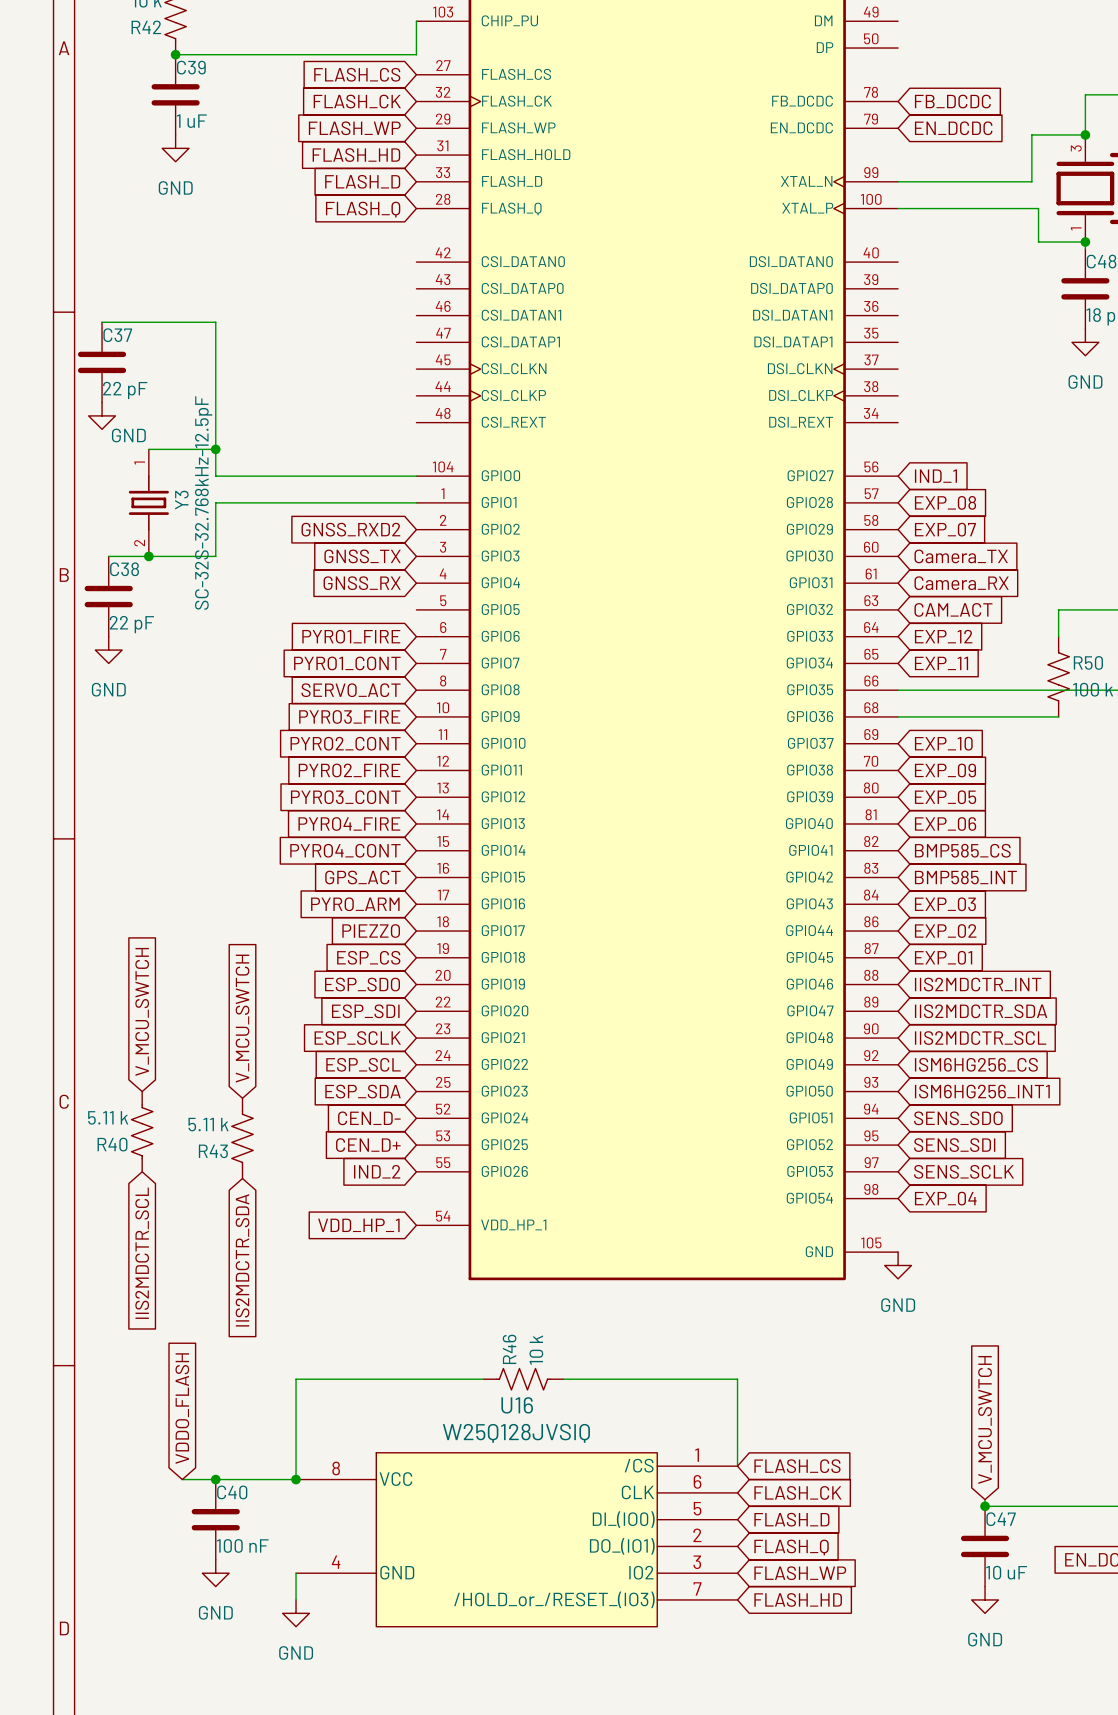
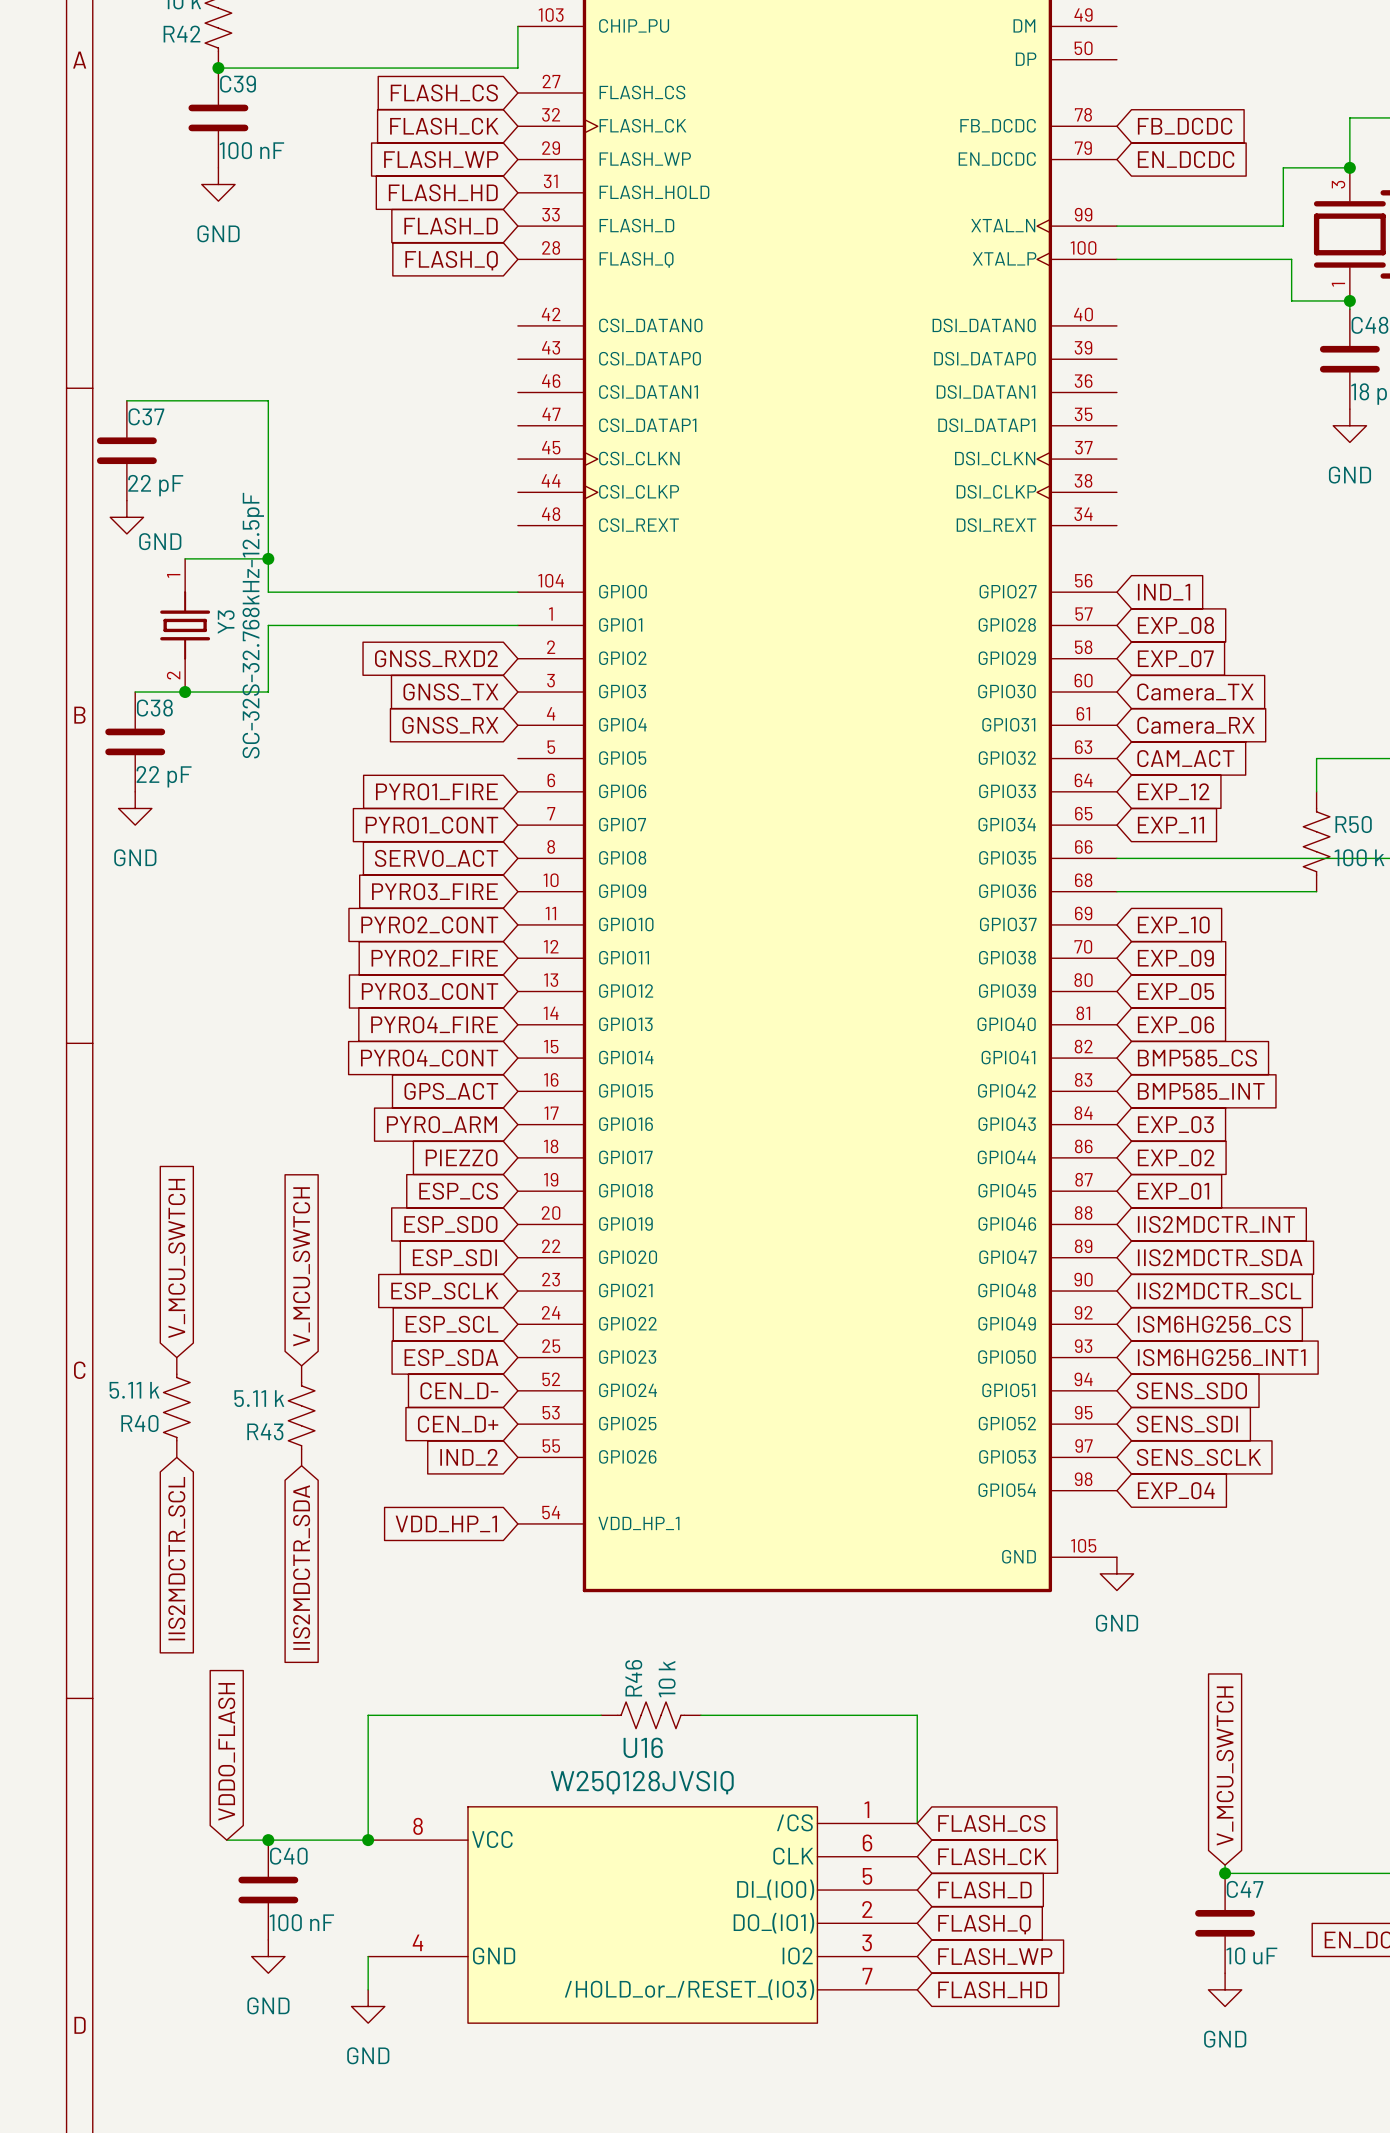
C39 value: 1 uF (191, 121) -> 100 nF (251, 150)

